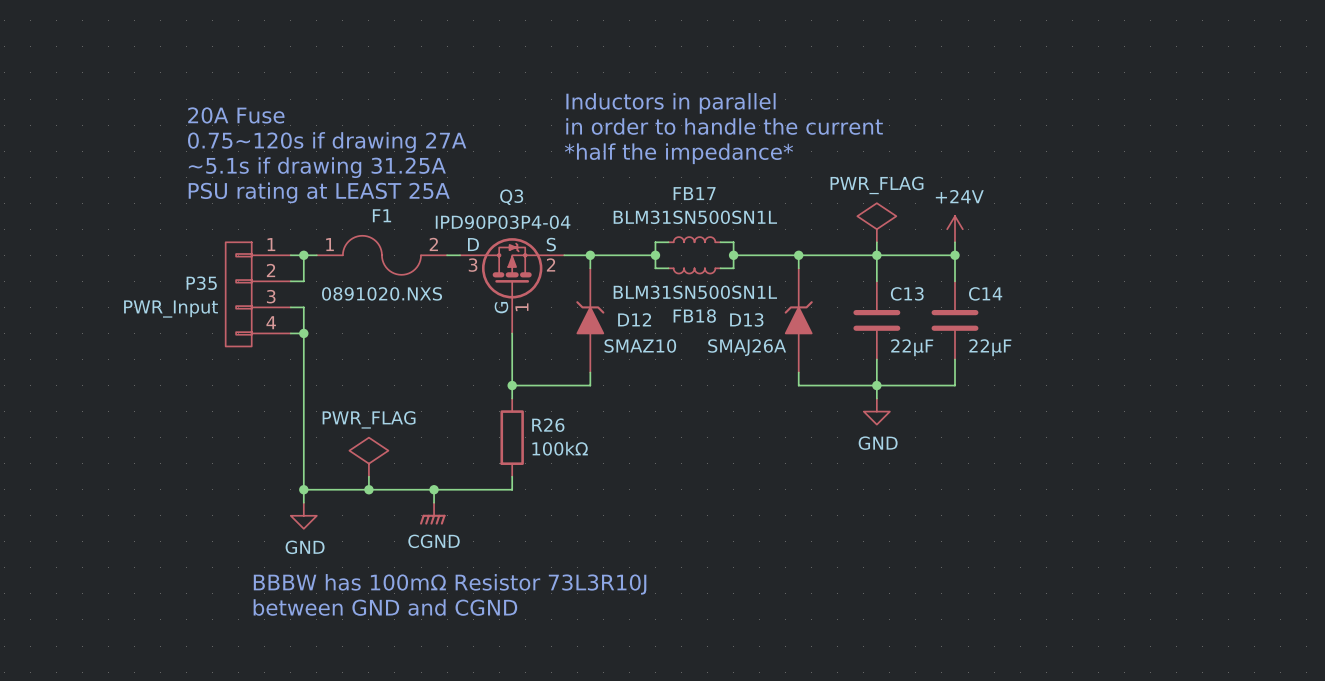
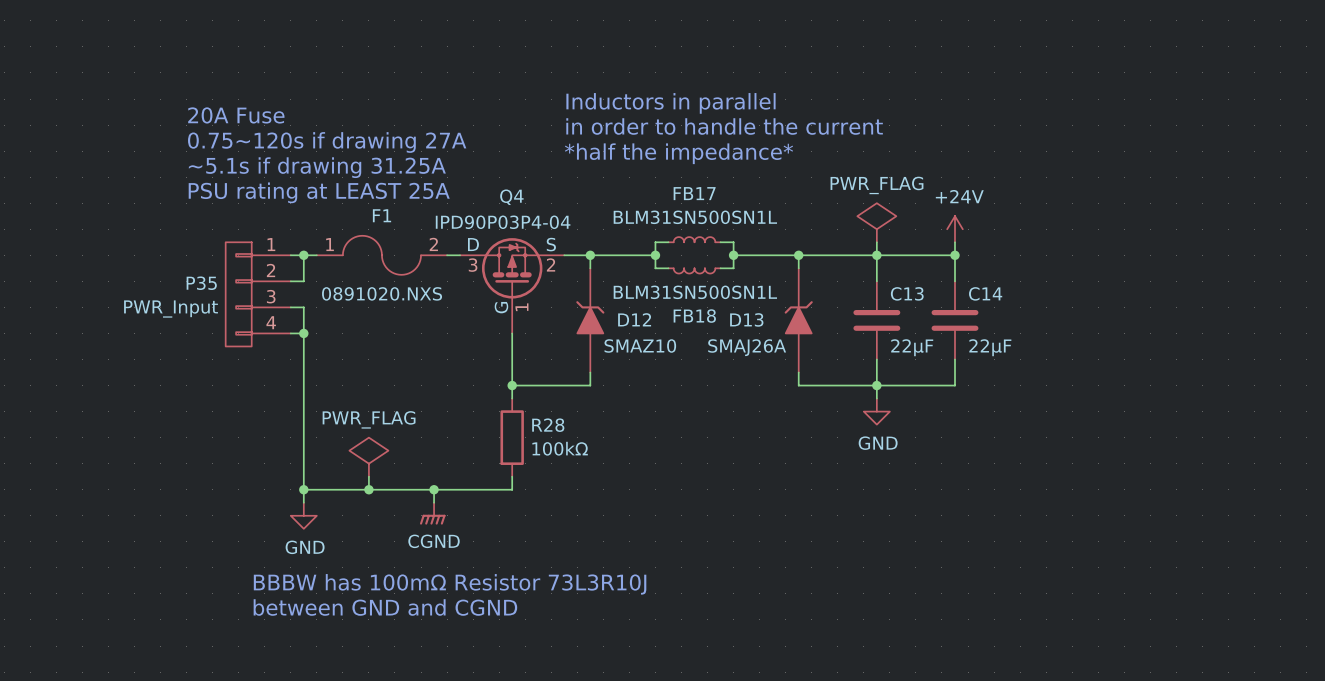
Q3 name: Q3 (511, 197) -> Q4 (511, 197)
R26 name: R26 (548, 425) -> R28 (548, 425)

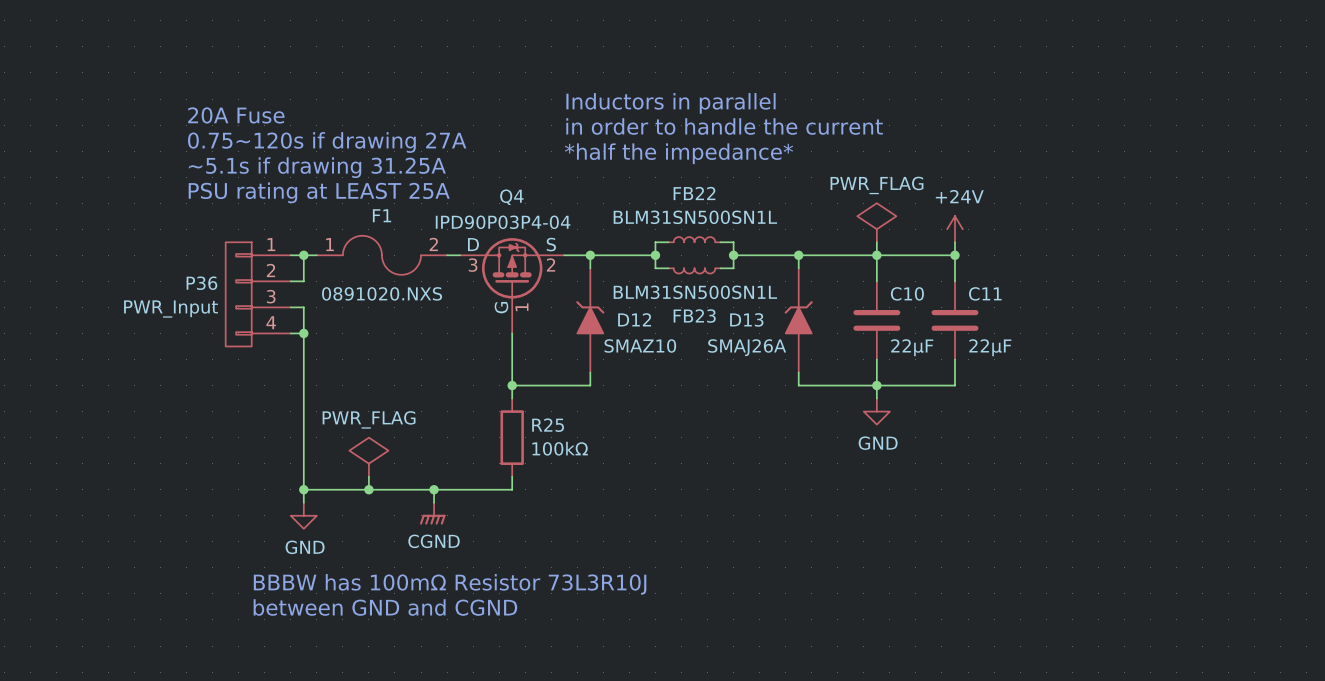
FB17 name: FB17 (694, 193) -> FB22 (694, 193)
P35 name: P35 (201, 283) -> P36 (201, 283)
C13 name: C13 (907, 293) -> C10 (907, 293)
C14 name: C14 (985, 293) -> C11 (985, 293)
FB18 name: FB18 (694, 316) -> FB23 (694, 316)
R28 name: R28 (548, 425) -> R25 (548, 425)

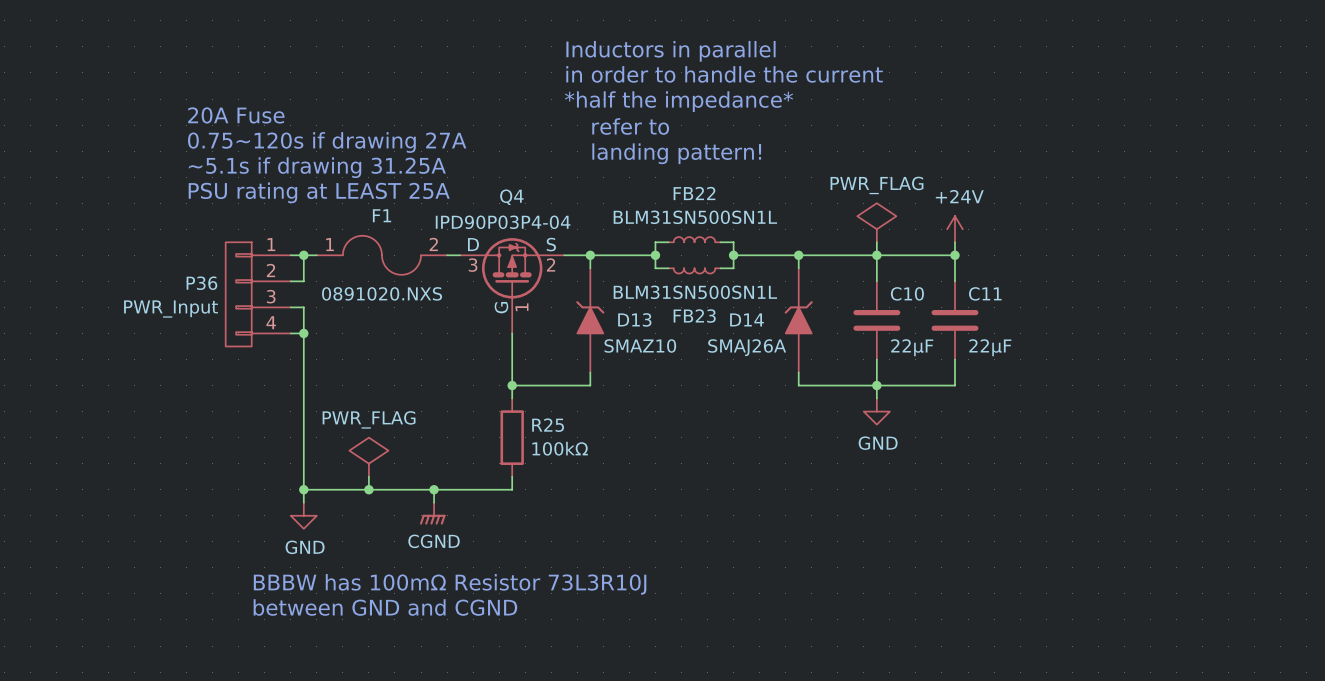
text: none -> Inductors in parallel (670, 51)
text: Inductors in parallel (670, 103) -> *half the impedance* (678, 101)
text: none -> refer to (630, 126)
text position: in order to handle the current (724, 126) -> in order to handle the current (724, 74)
text: none -> landing pattern! (676, 153)
text: *half the impedance* (678, 153) -> none
D12 name: D12 (634, 319) -> D13 (634, 319)
D13 name: D13 (746, 319) -> D14 (746, 319)

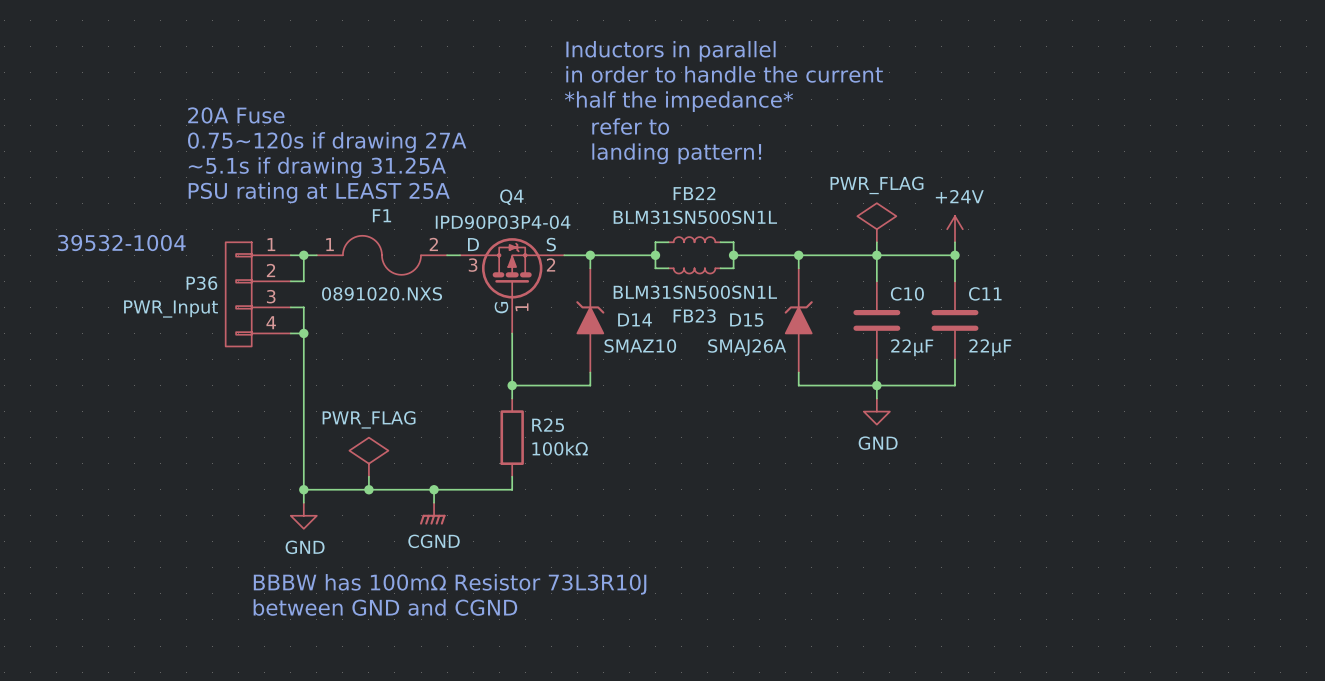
text: none -> 39532-1004 (121, 243)
D13 name: D13 (634, 319) -> D14 (635, 319)
D14 name: D14 (746, 319) -> D15 (746, 320)

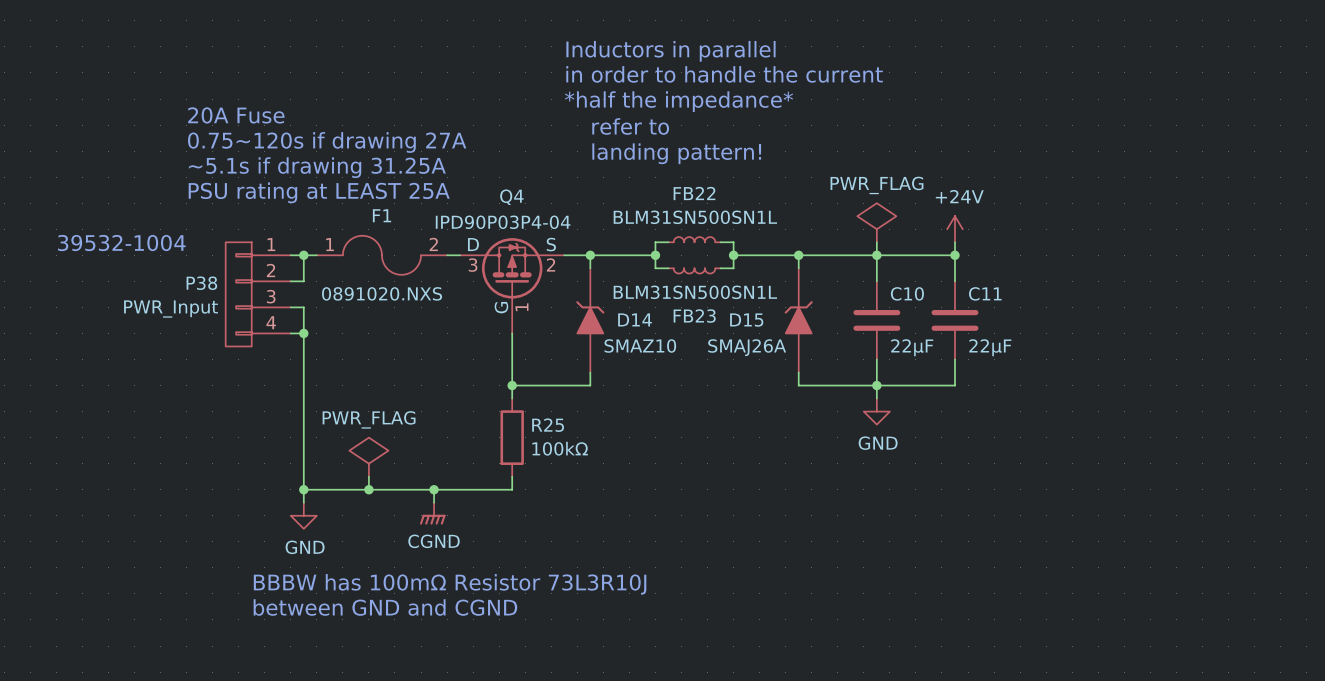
P36 name: P36 (201, 283) -> P38 (201, 283)

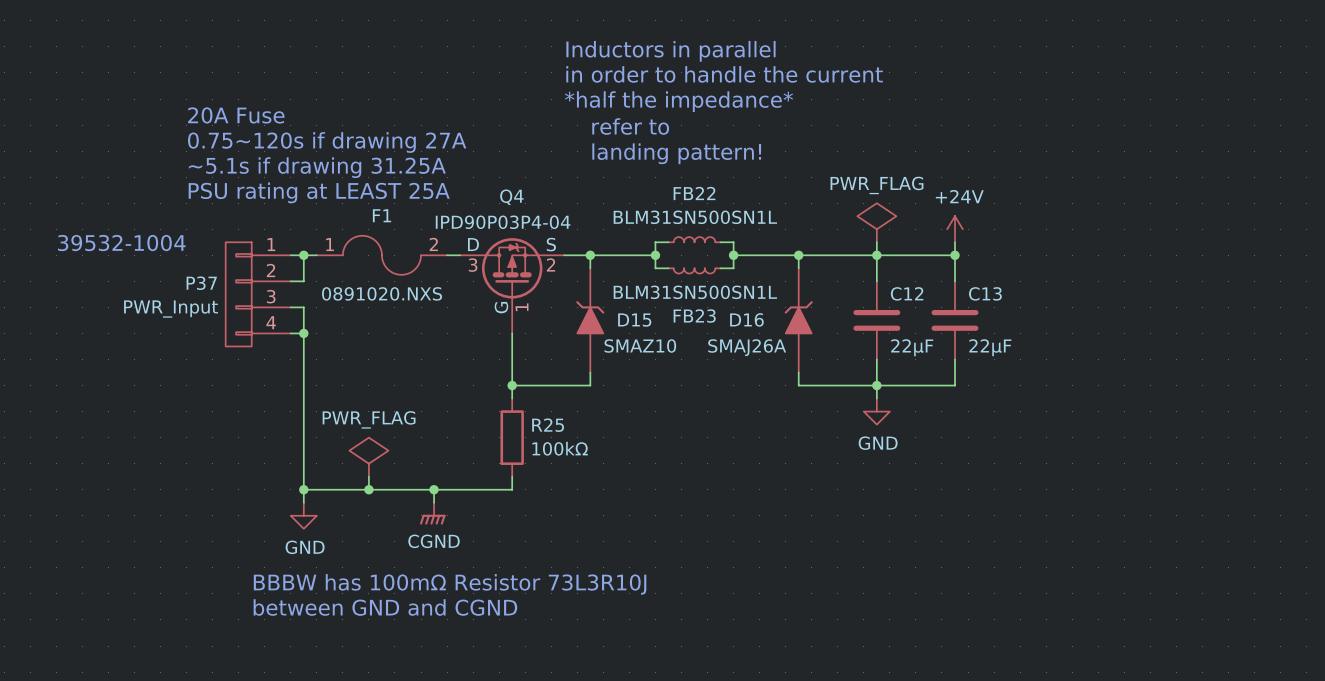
P38 name: P38 (201, 283) -> P37 (201, 283)
C10 name: C10 (907, 293) -> C12 (907, 293)
C11 name: C11 (985, 293) -> C13 (985, 293)
D14 name: D14 (635, 319) -> D15 (634, 320)
D15 name: D15 (746, 320) -> D16 (746, 319)

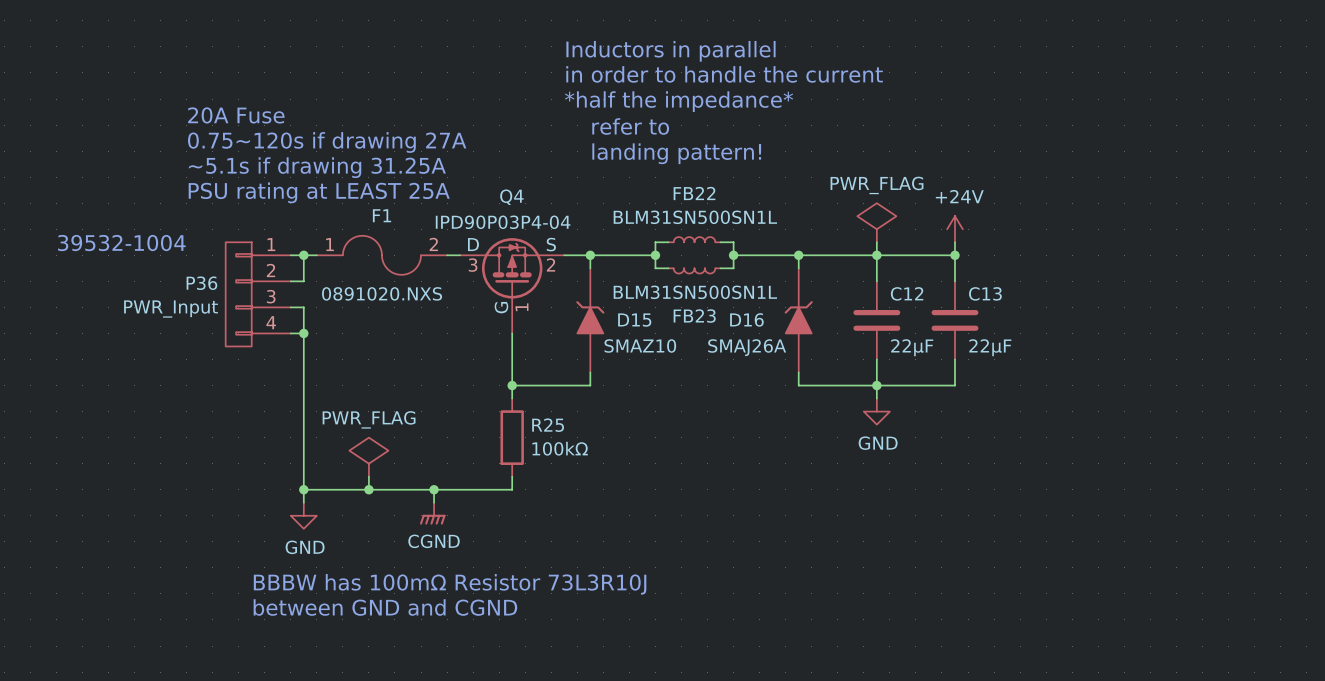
P37 name: P37 (201, 283) -> P36 (201, 283)

